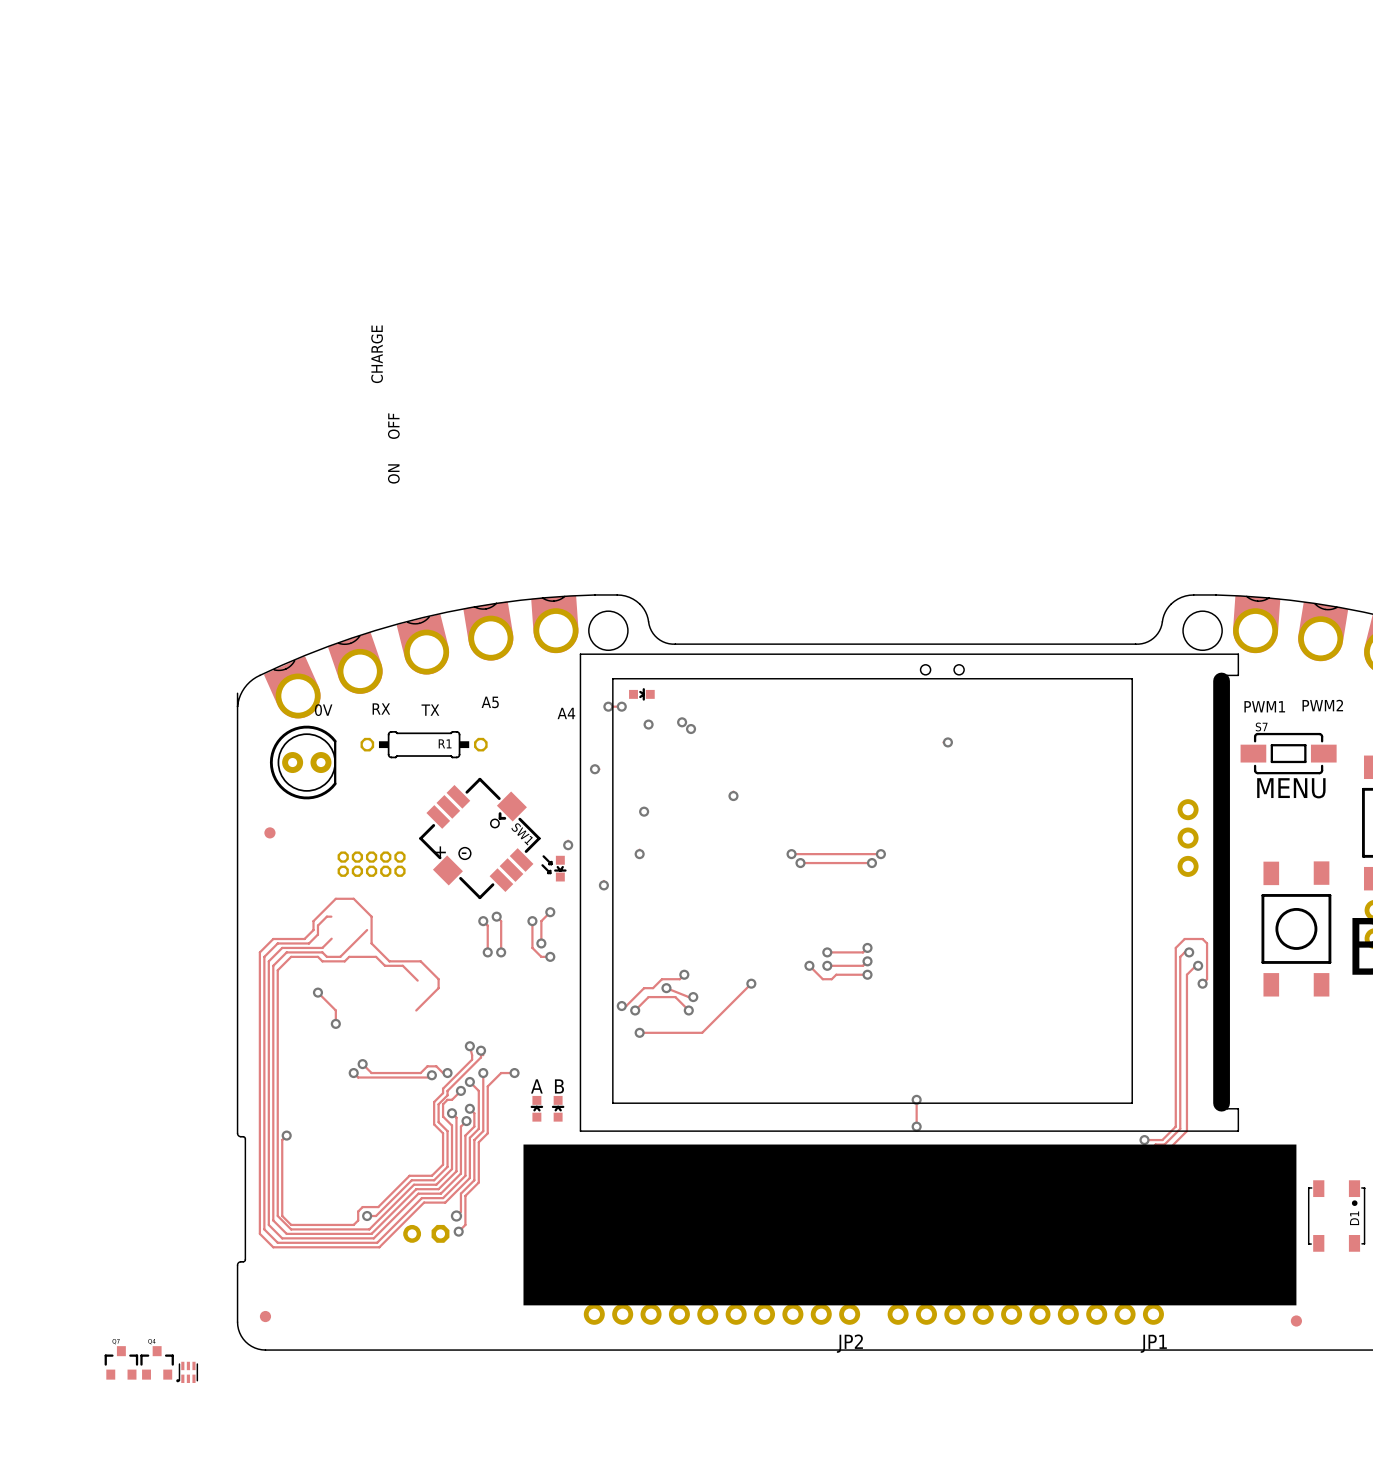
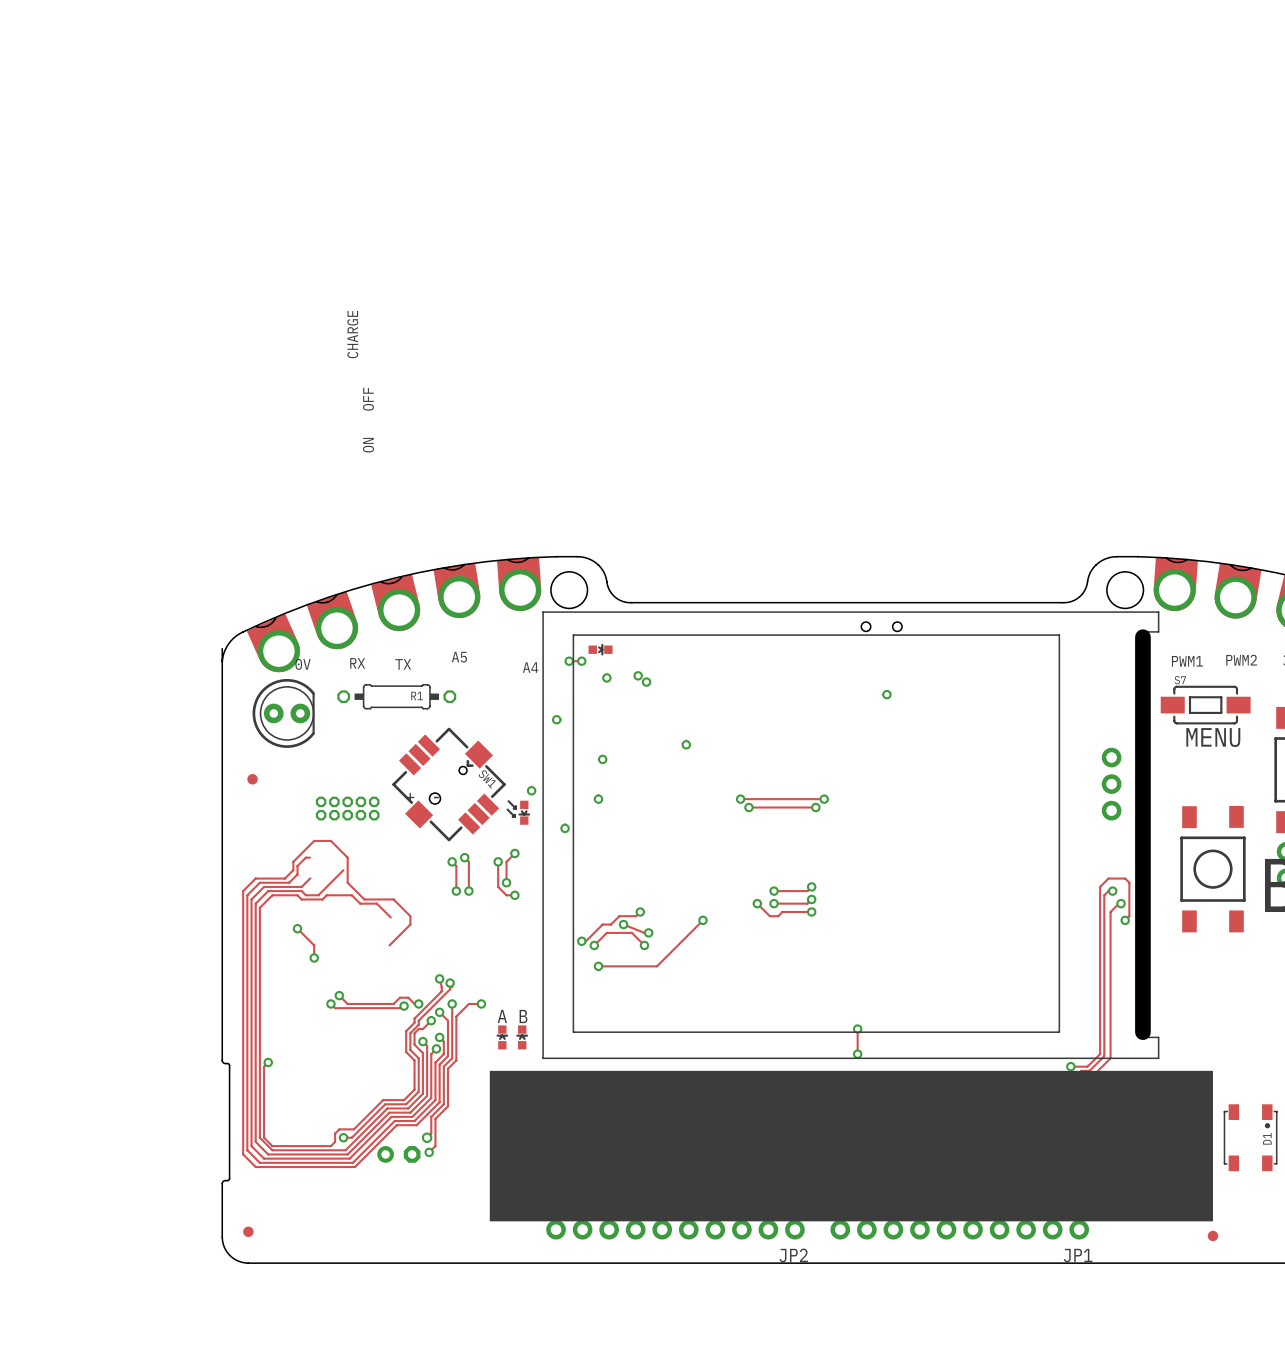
part: (121, 1362) -> none
part: (157, 1362) -> none
part: (187, 1372) -> none

